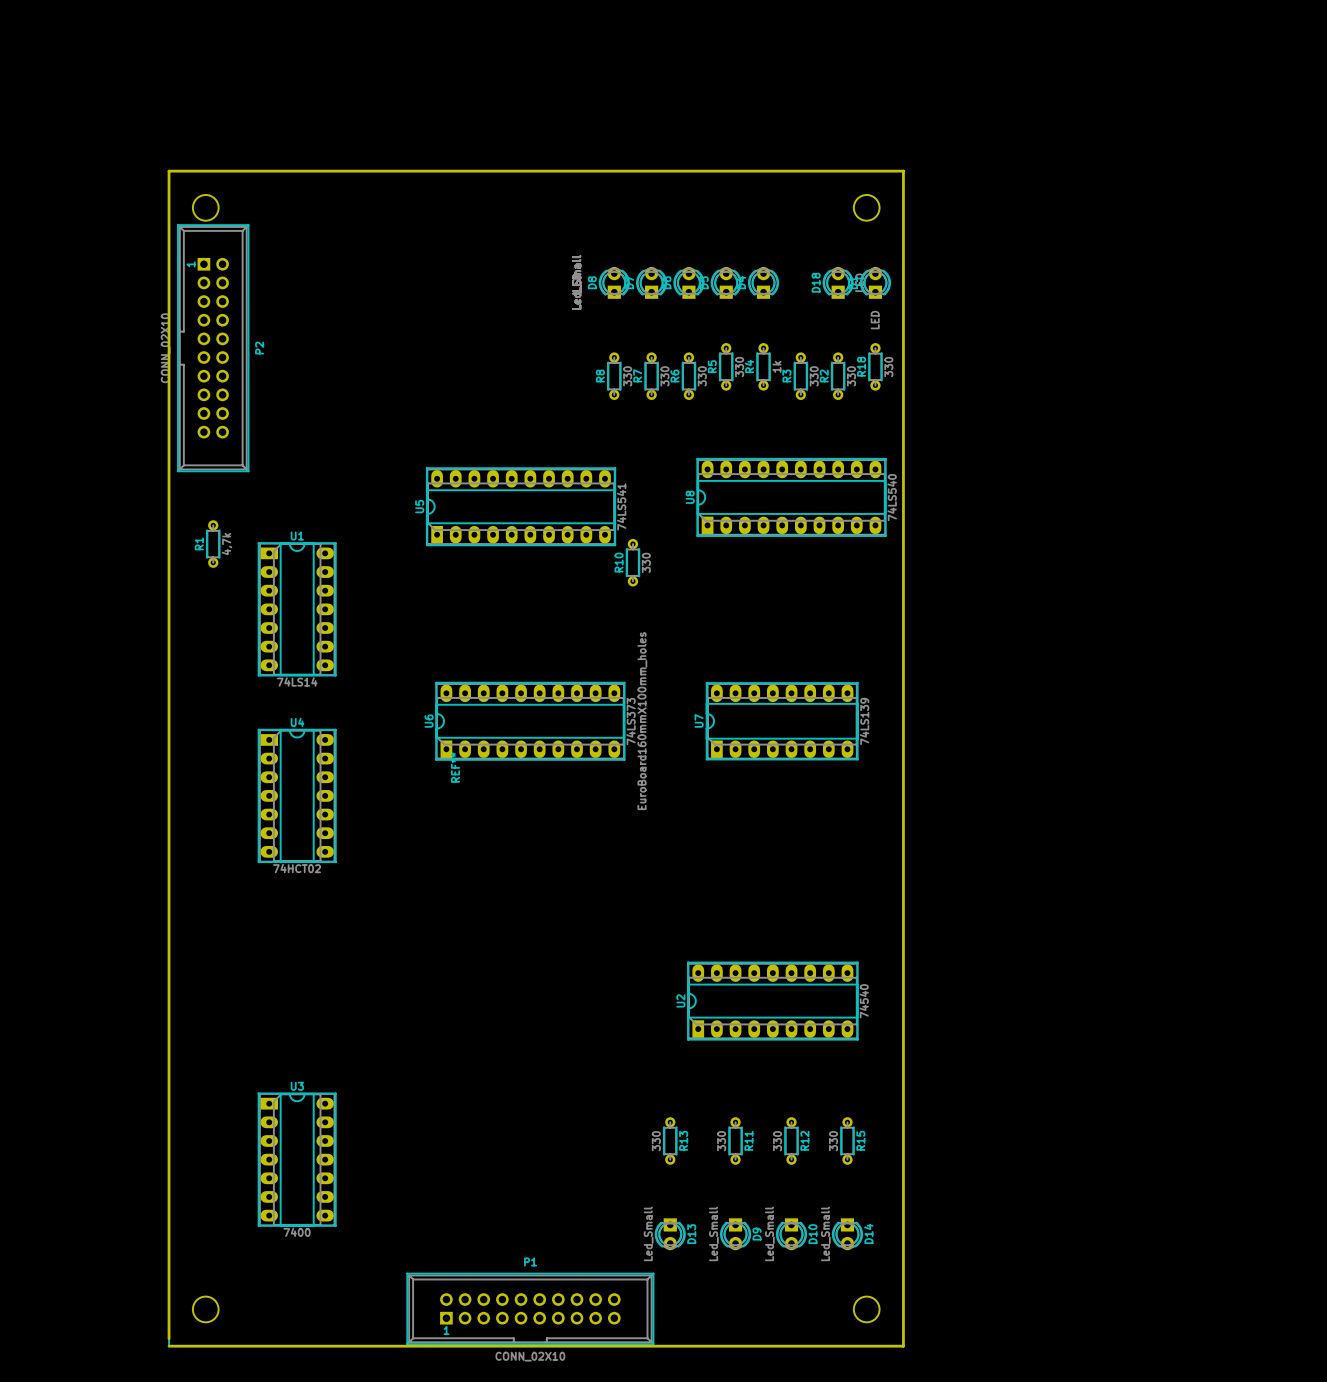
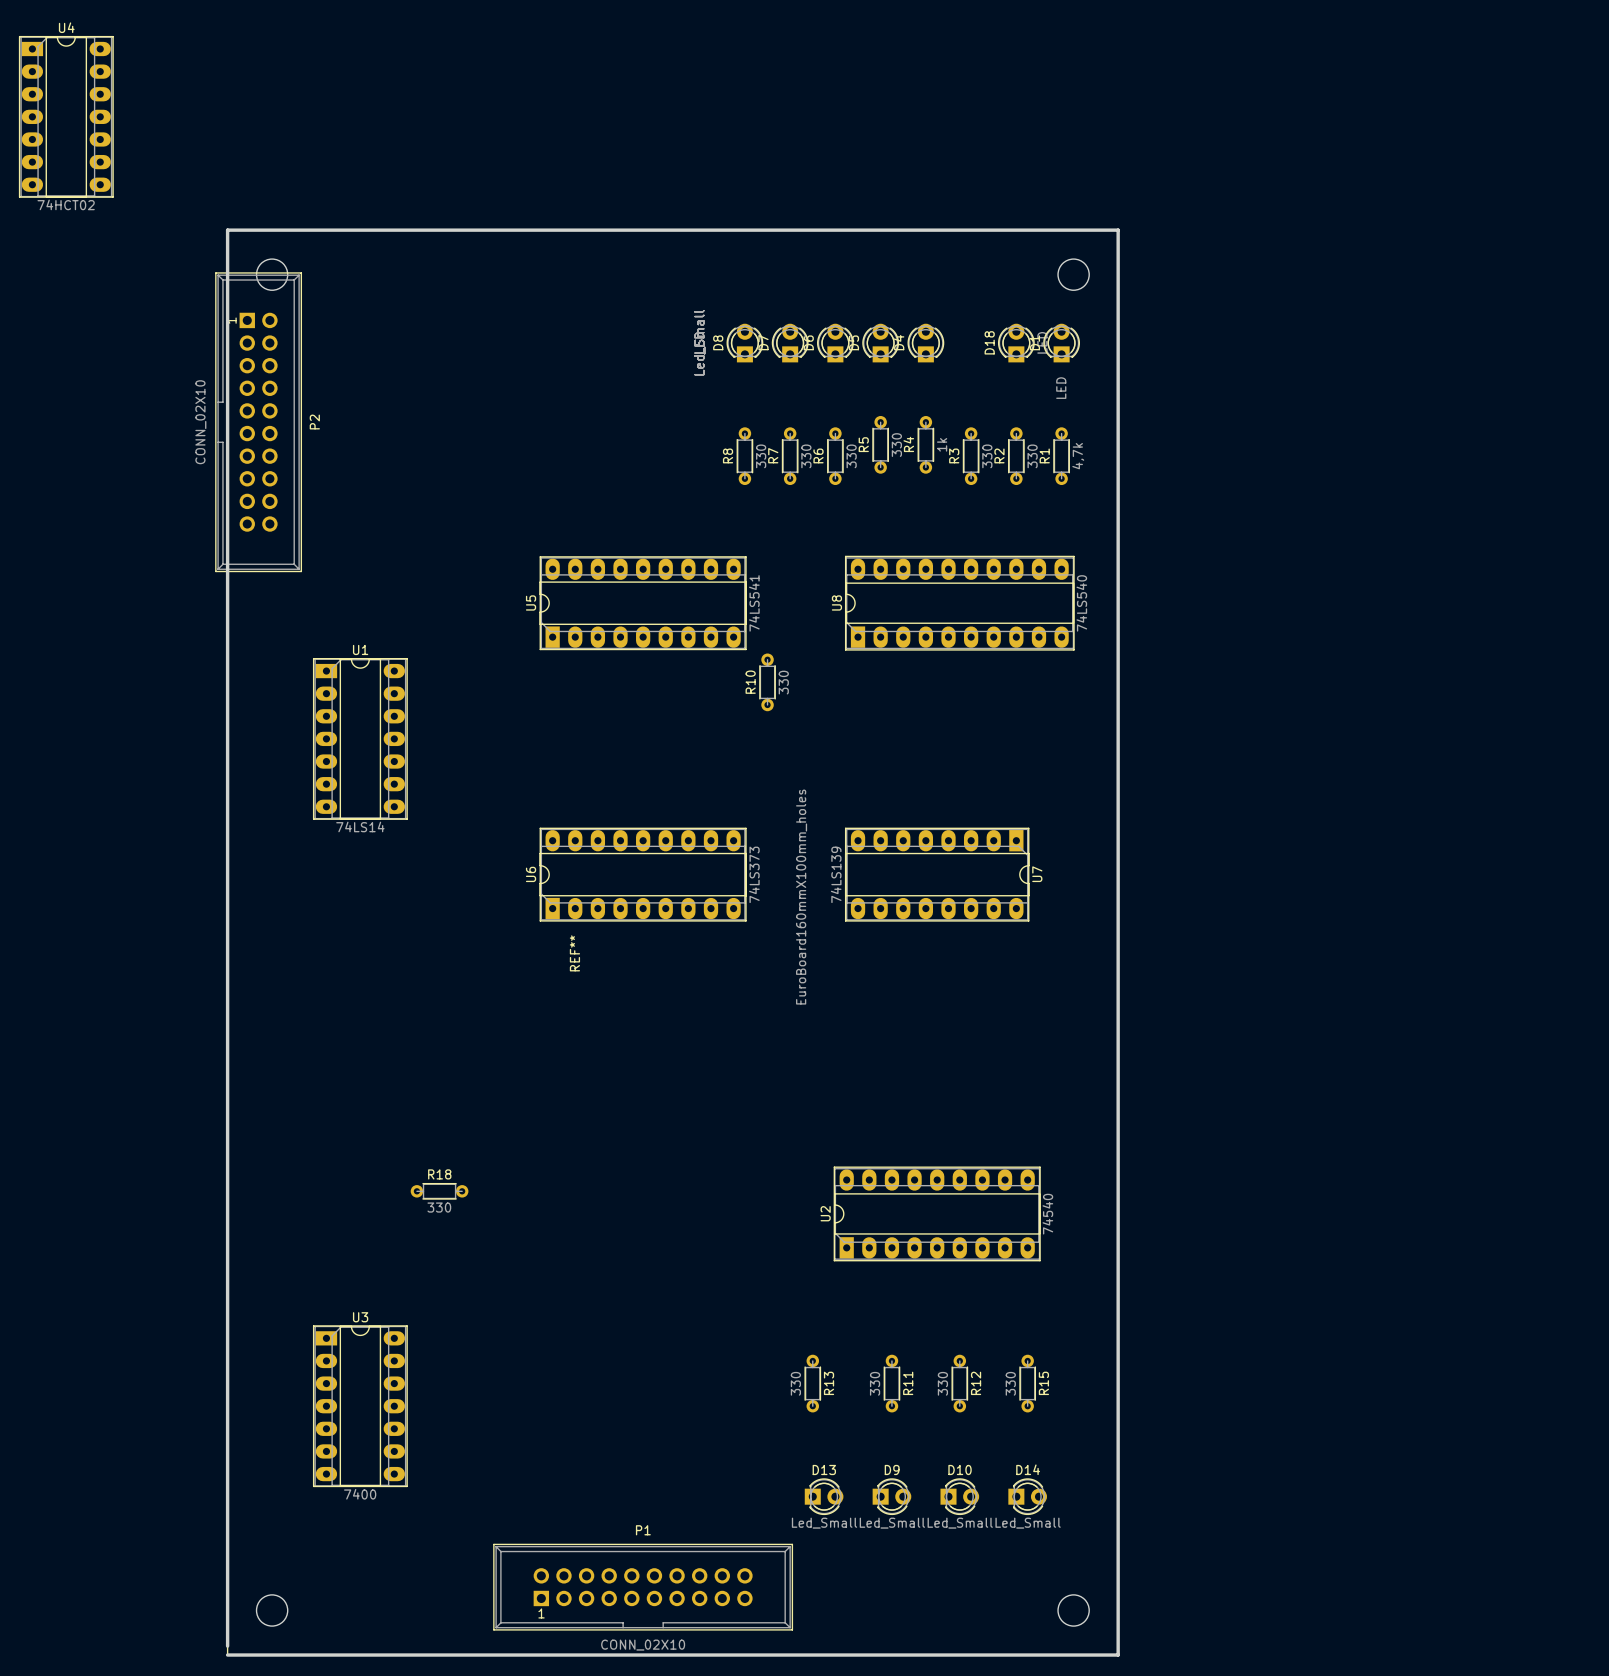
R18 rotation: 0° (875, 366) -> 90° clockwise (439, 1191)
R18 position: (875, 366) -> (439, 1191)
U5 footprint: [426, 467, 616, 546] -> [539, 556, 747, 651]
R1 position: (213, 544) -> (1061, 456)
U6 footprint: [435, 682, 625, 761] -> [539, 827, 747, 922]
U7 rotation: 0° (782, 721) -> 180° (937, 874)
REF** position: (536, 758) -> (672, 942)
U4 position: (297, 795) -> (66, 116)
D13 rotation: 0° (670, 1234) -> 90° counterclockwise (824, 1496)
D9 rotation: 0° (735, 1234) -> 90° counterclockwise (891, 1496)
D10 rotation: 0° (791, 1234) -> 90° counterclockwise (959, 1496)
D14 rotation: 0° (847, 1234) -> 90° counterclockwise (1027, 1496)

